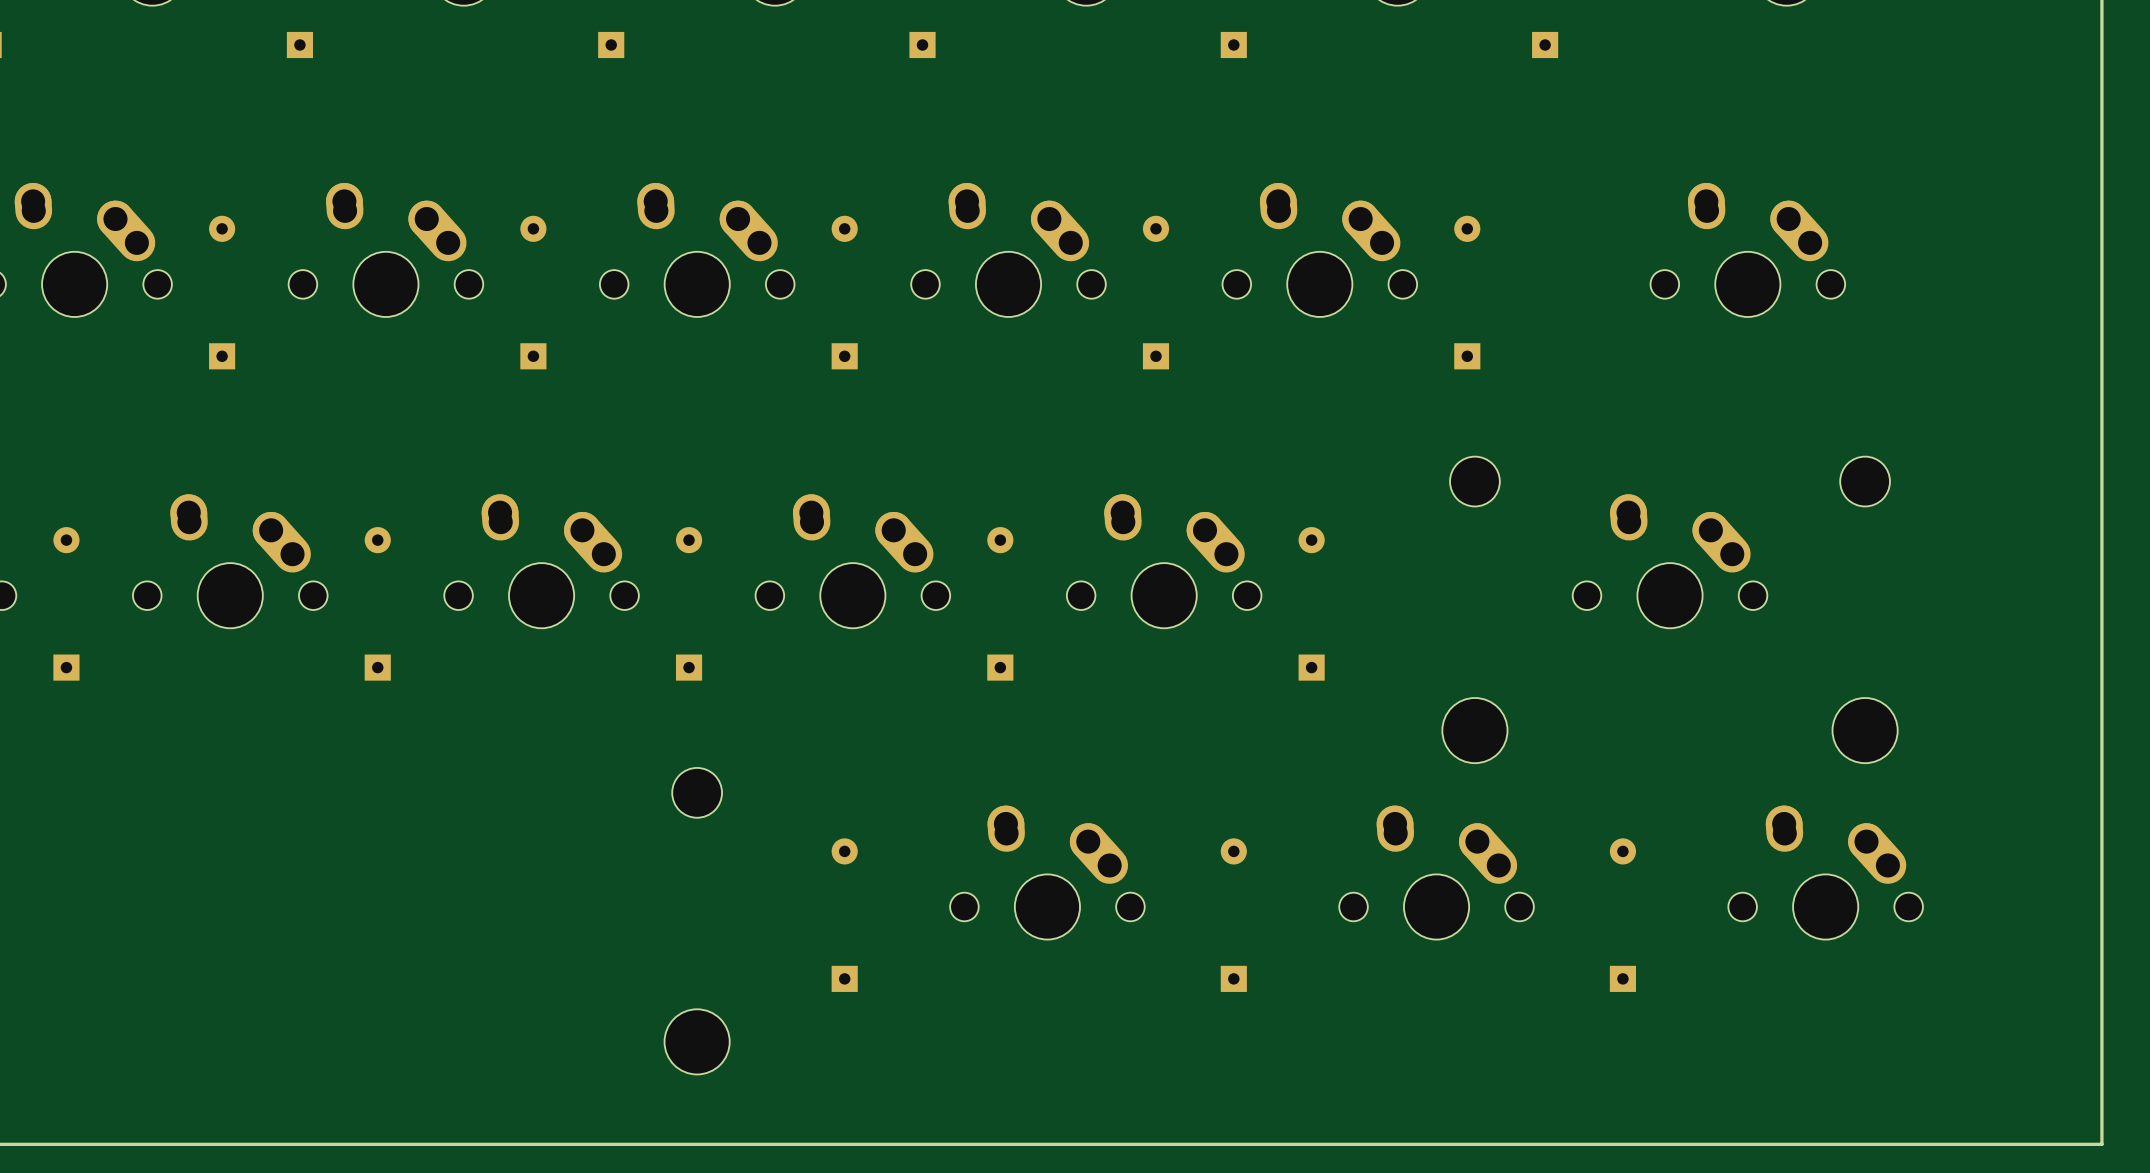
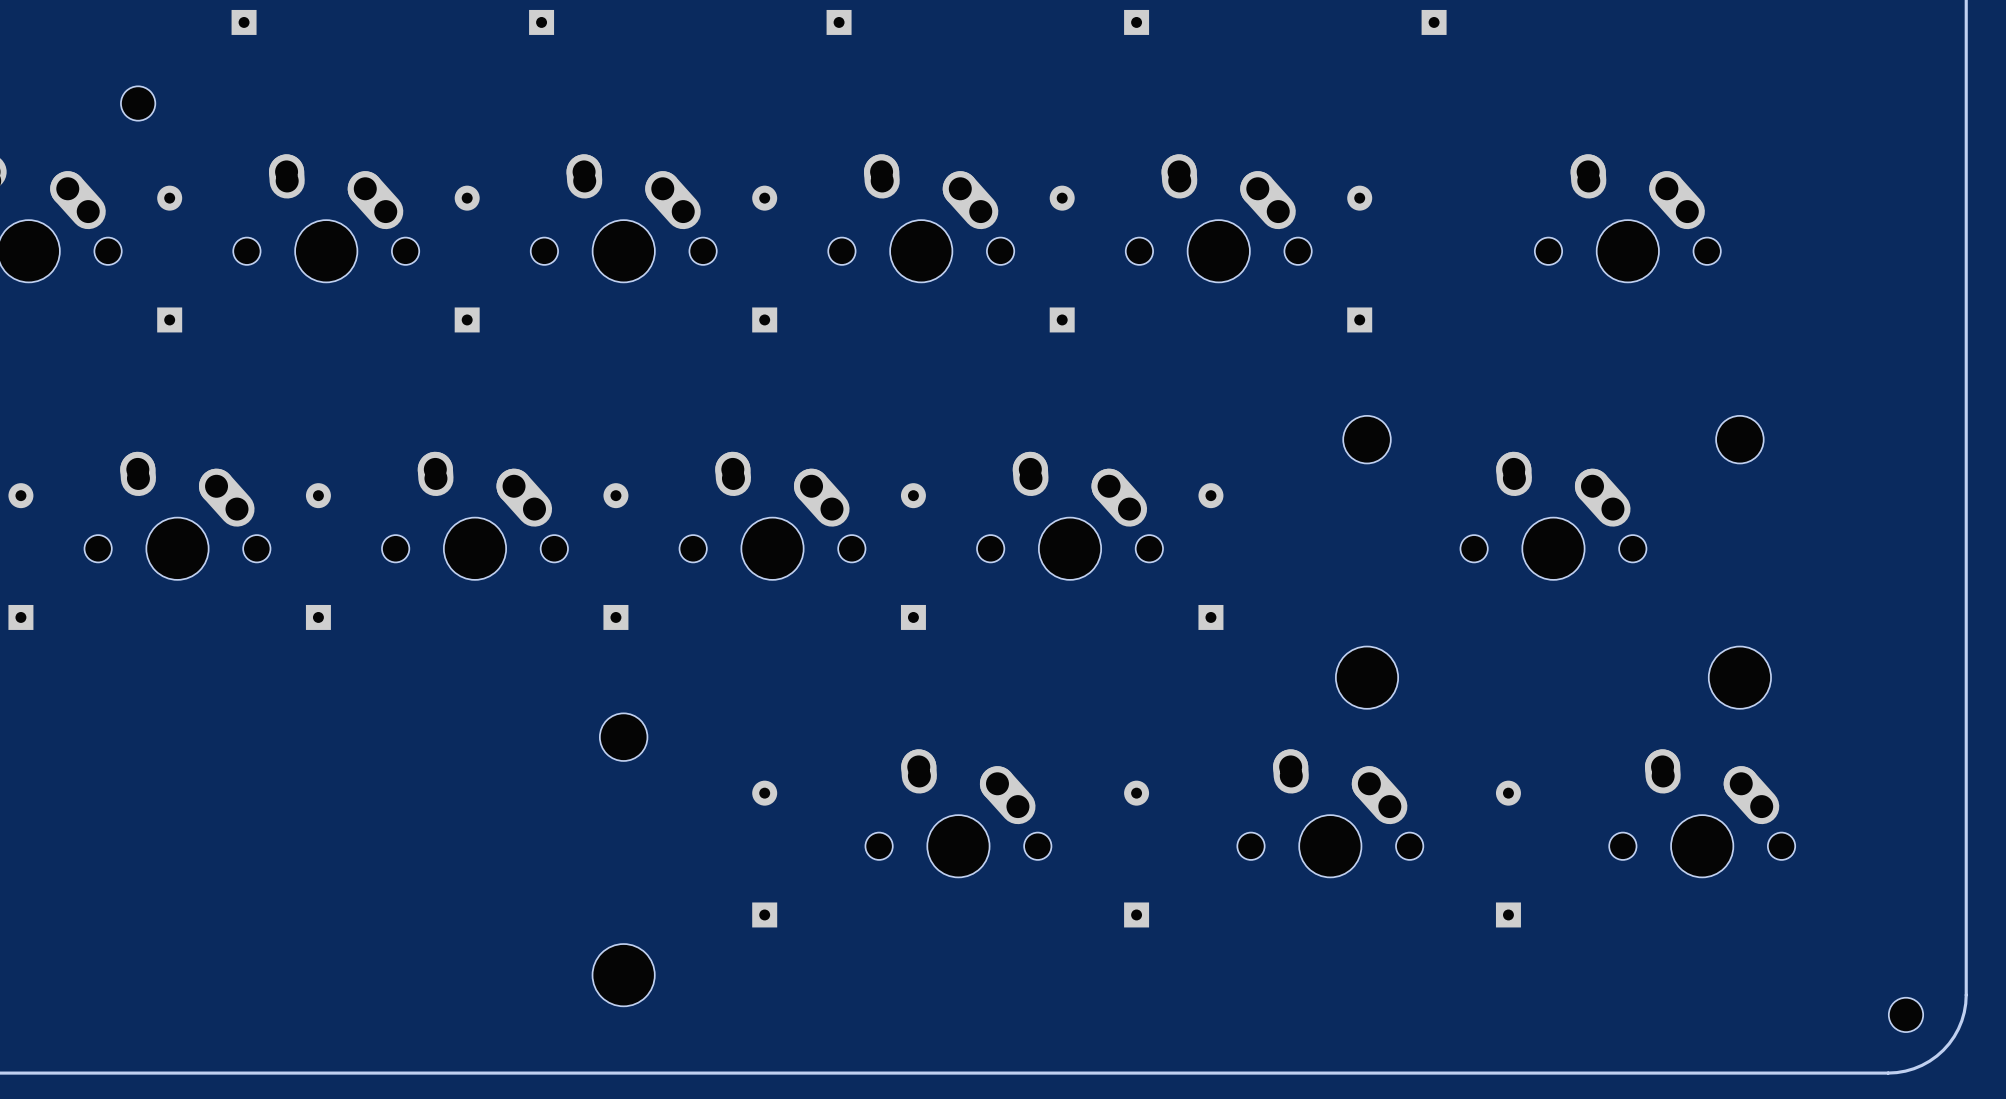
part: none -> (138, 103)
board edge: (2101, 1062) (2101, 1144) (2020, 1144) -> (1966, 995) (1961, 1020) (1954, 1036) (1943, 1050) (1929, 1061) (1913, 1068) (1888, 1073)
part: none -> (1905, 1014)

